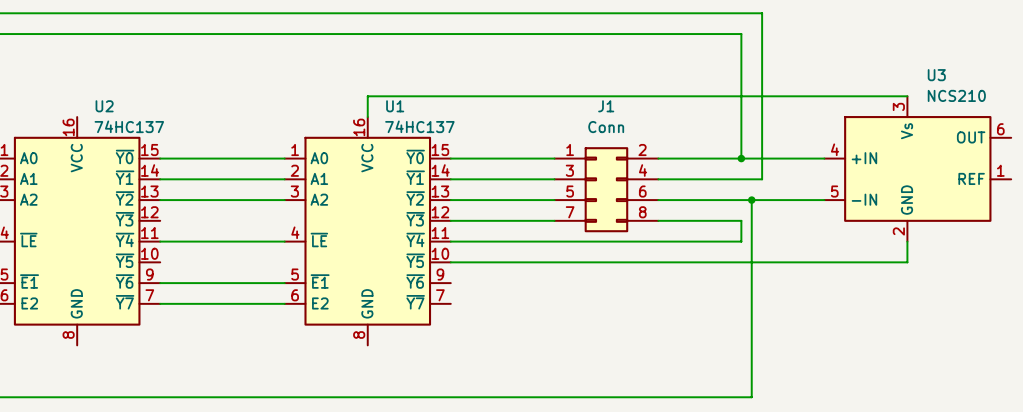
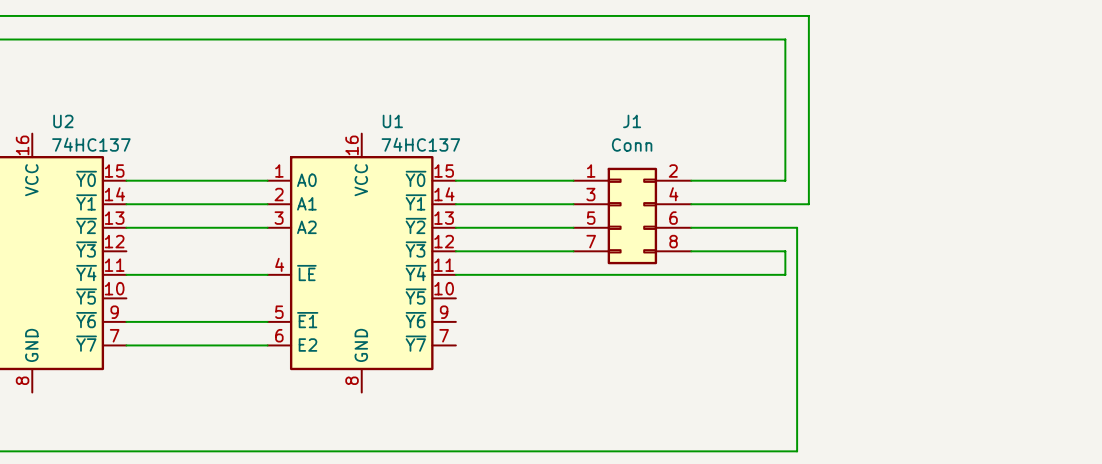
wire: (907, 96) (367, 96) (367, 117) -> none
wire: (741, 158) (824, 158) -> none
junction: (741, 158) -> none
U3: NCS210 (917, 168) -> none
wire: (751, 200) (824, 200) -> none
junction: (751, 200) -> none
wire: (907, 241) (907, 262) (450, 262) -> none

